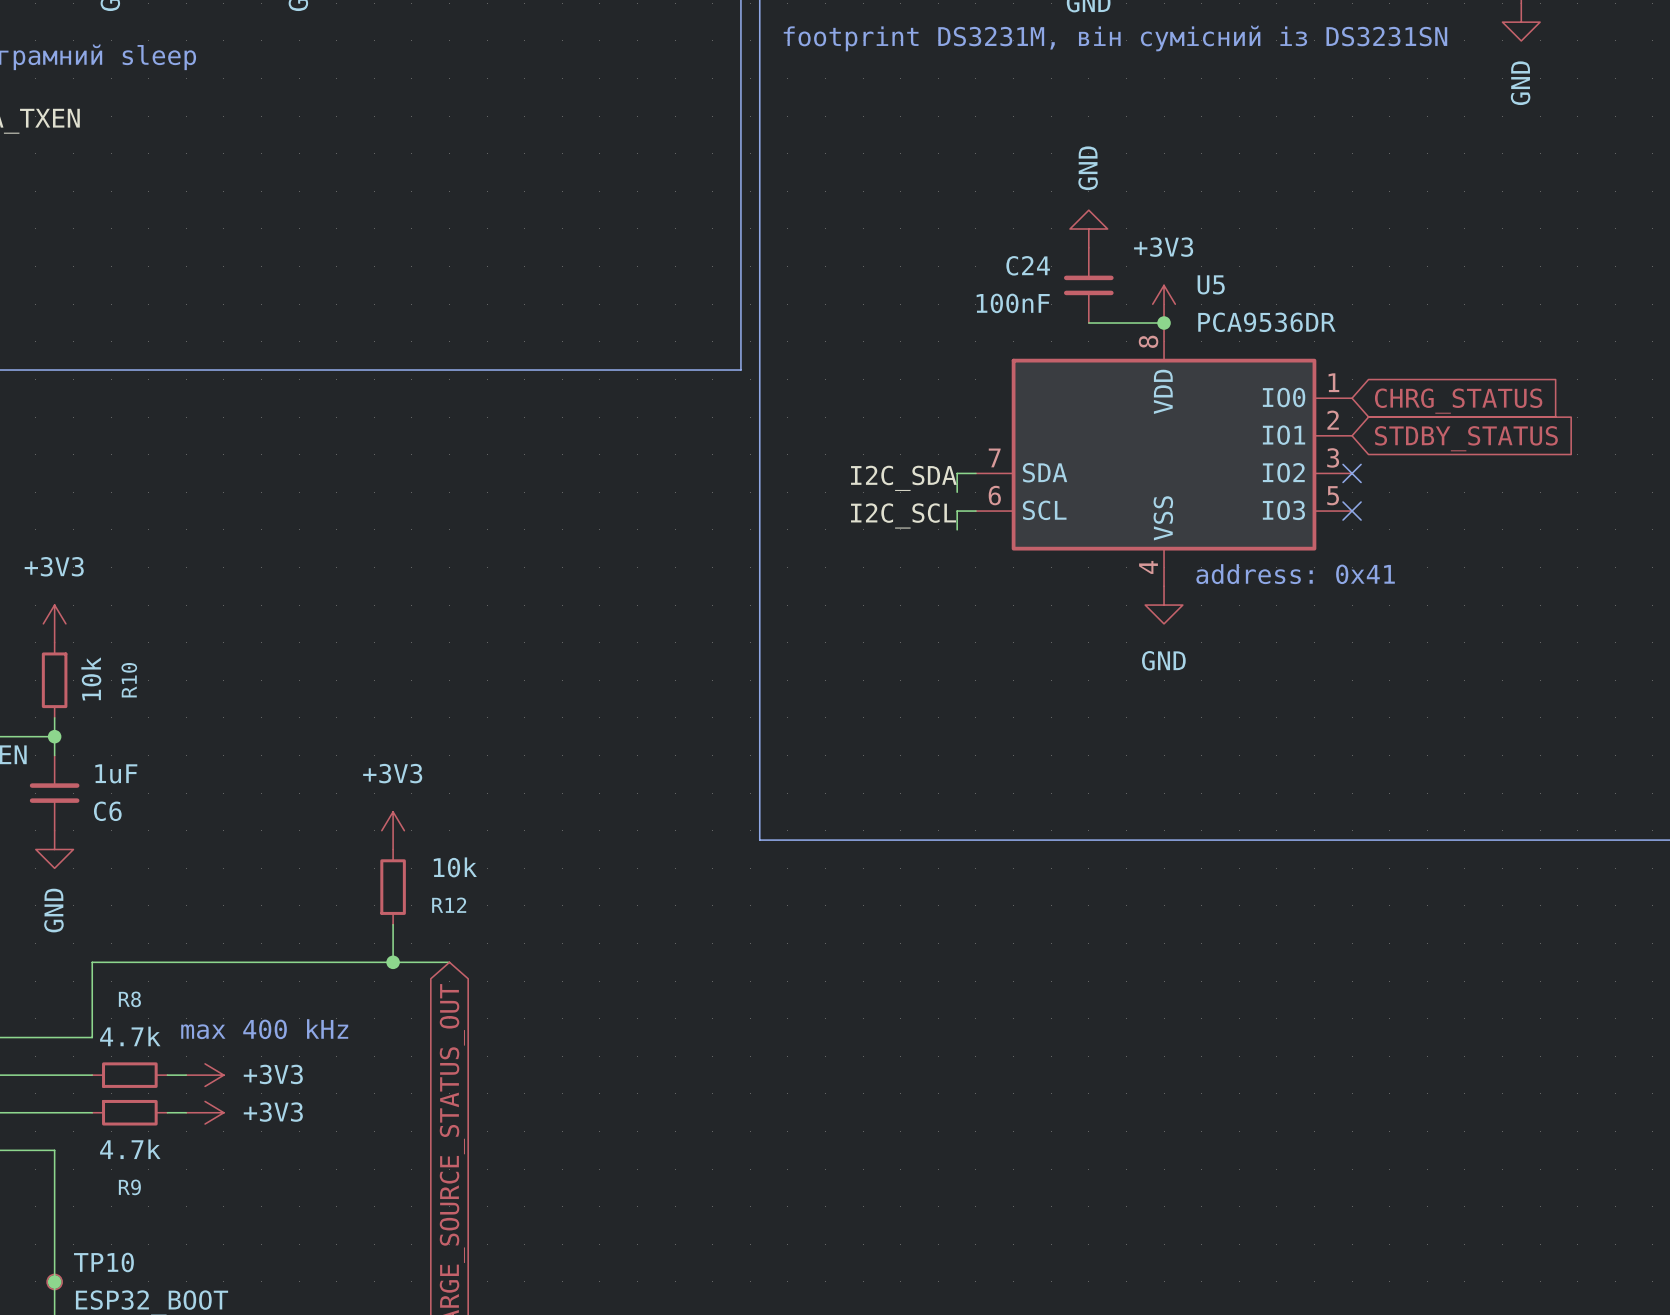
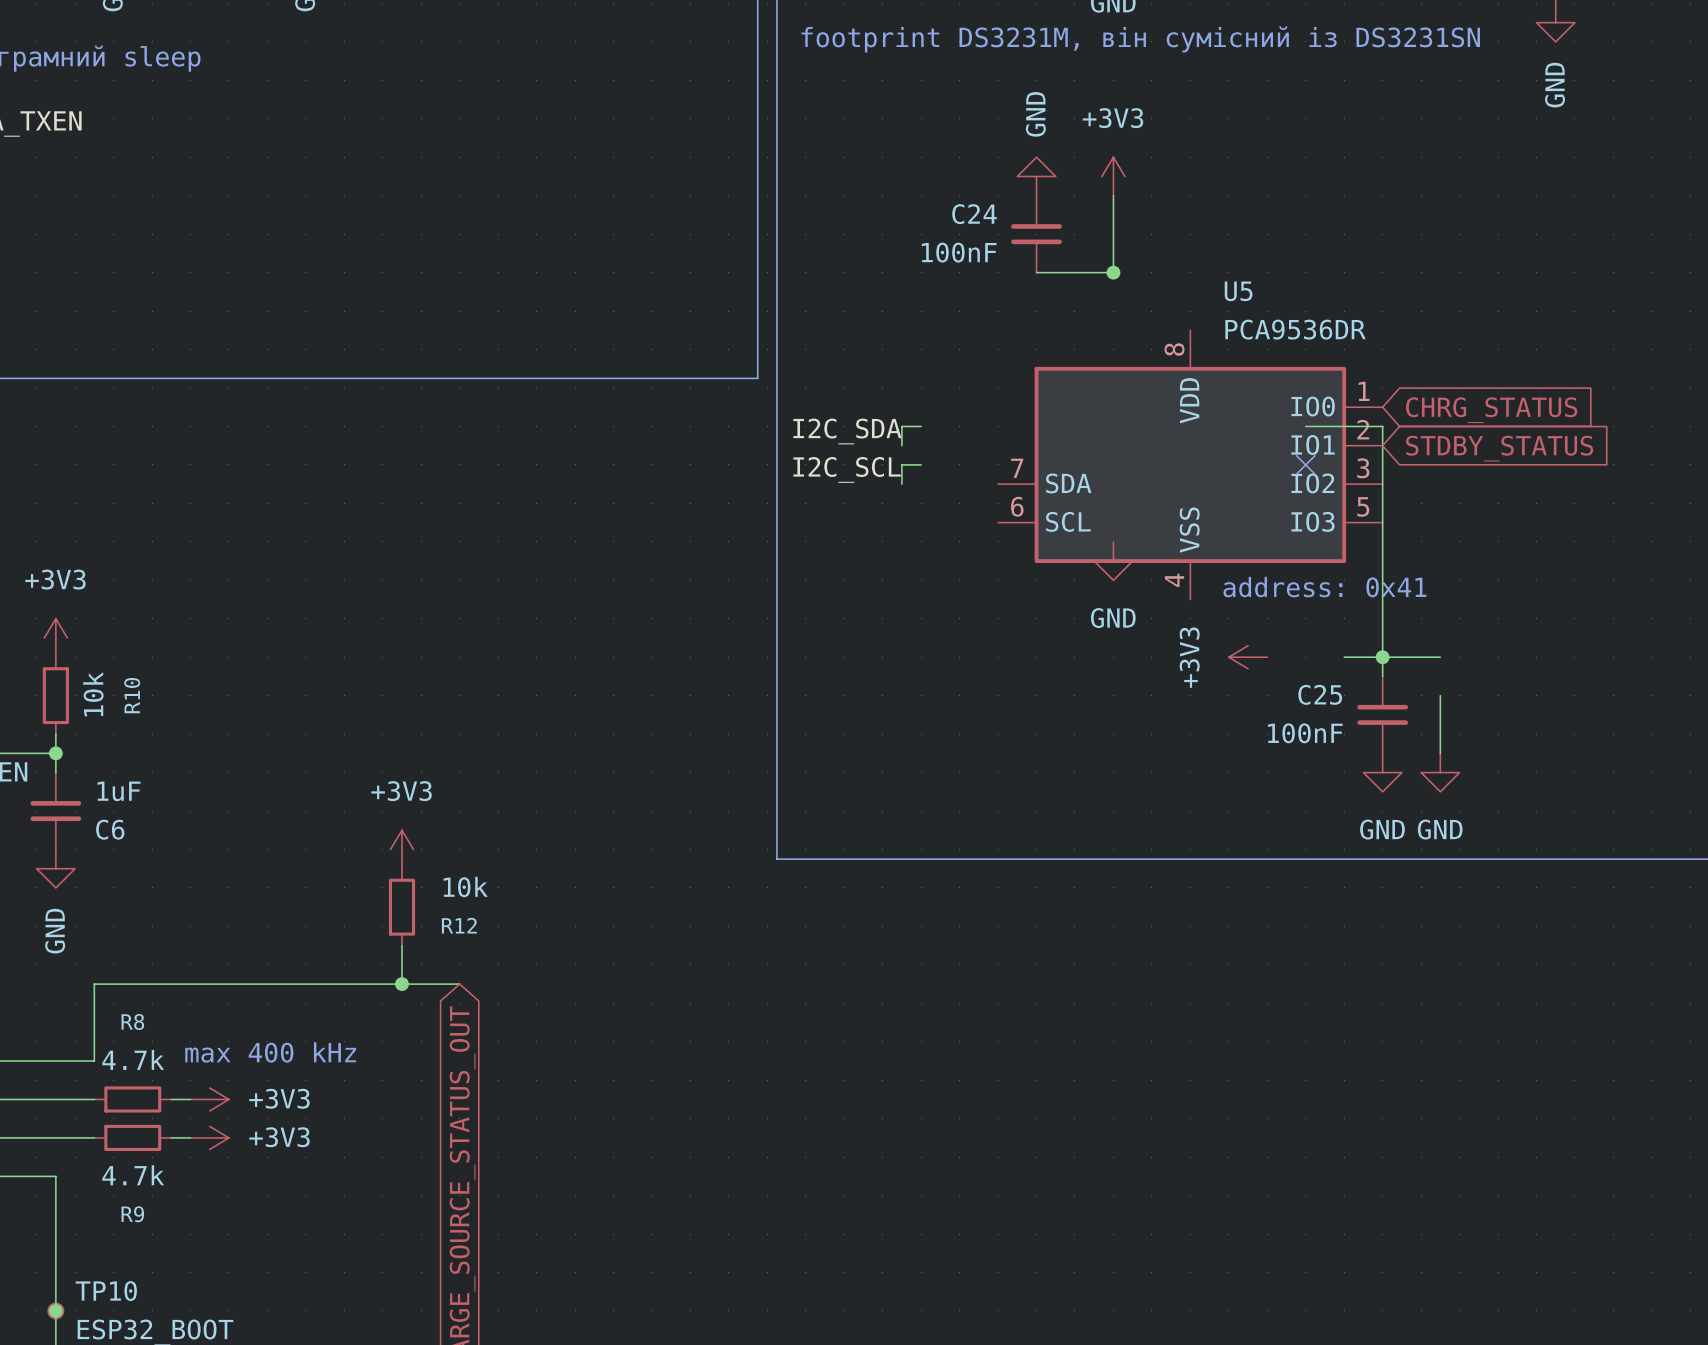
wire: none -> (1113, 195) (1113, 272) (1036, 272)
power symbol position: GND (1088, 228) -> GND (1036, 176)
junction: none -> (1113, 272)
C24 position: (1088, 285) -> (1036, 234)
power symbol position: +3V3 (1164, 304) -> +3V3 (1113, 176)
wire: (1088, 323) (1164, 323) -> none
junction: (1164, 323) -> none
wire: none -> (1305, 426) (1382, 426) (1382, 676)
no-connect mark: none -> (1305, 464)
wire: (975, 473) (957, 473) (957, 492) -> (921, 426) (901, 426) (901, 445)
no-connect mark: (1352, 473) -> none
label position: I2C_SDA (903, 478) -> I2C_SDA (847, 431)
wire: (975, 511) (957, 511) (957, 529) -> (921, 464) (901, 464) (901, 484)
no-connect mark: (1352, 511) -> none
label position: I2C_SCL (903, 515) -> I2C_SCL (847, 469)
power symbol position: GND (1164, 605) -> GND (1113, 561)
power symbol: none -> +3V3 (1248, 657)
wire: none -> (1344, 657) (1440, 657)
junction: none -> (1382, 657)
wire: none -> (1440, 695) (1440, 753)
C25: none -> 100nF (1382, 714)
power symbol: none -> GND (1382, 772)
power symbol: none -> GND (1440, 772)

